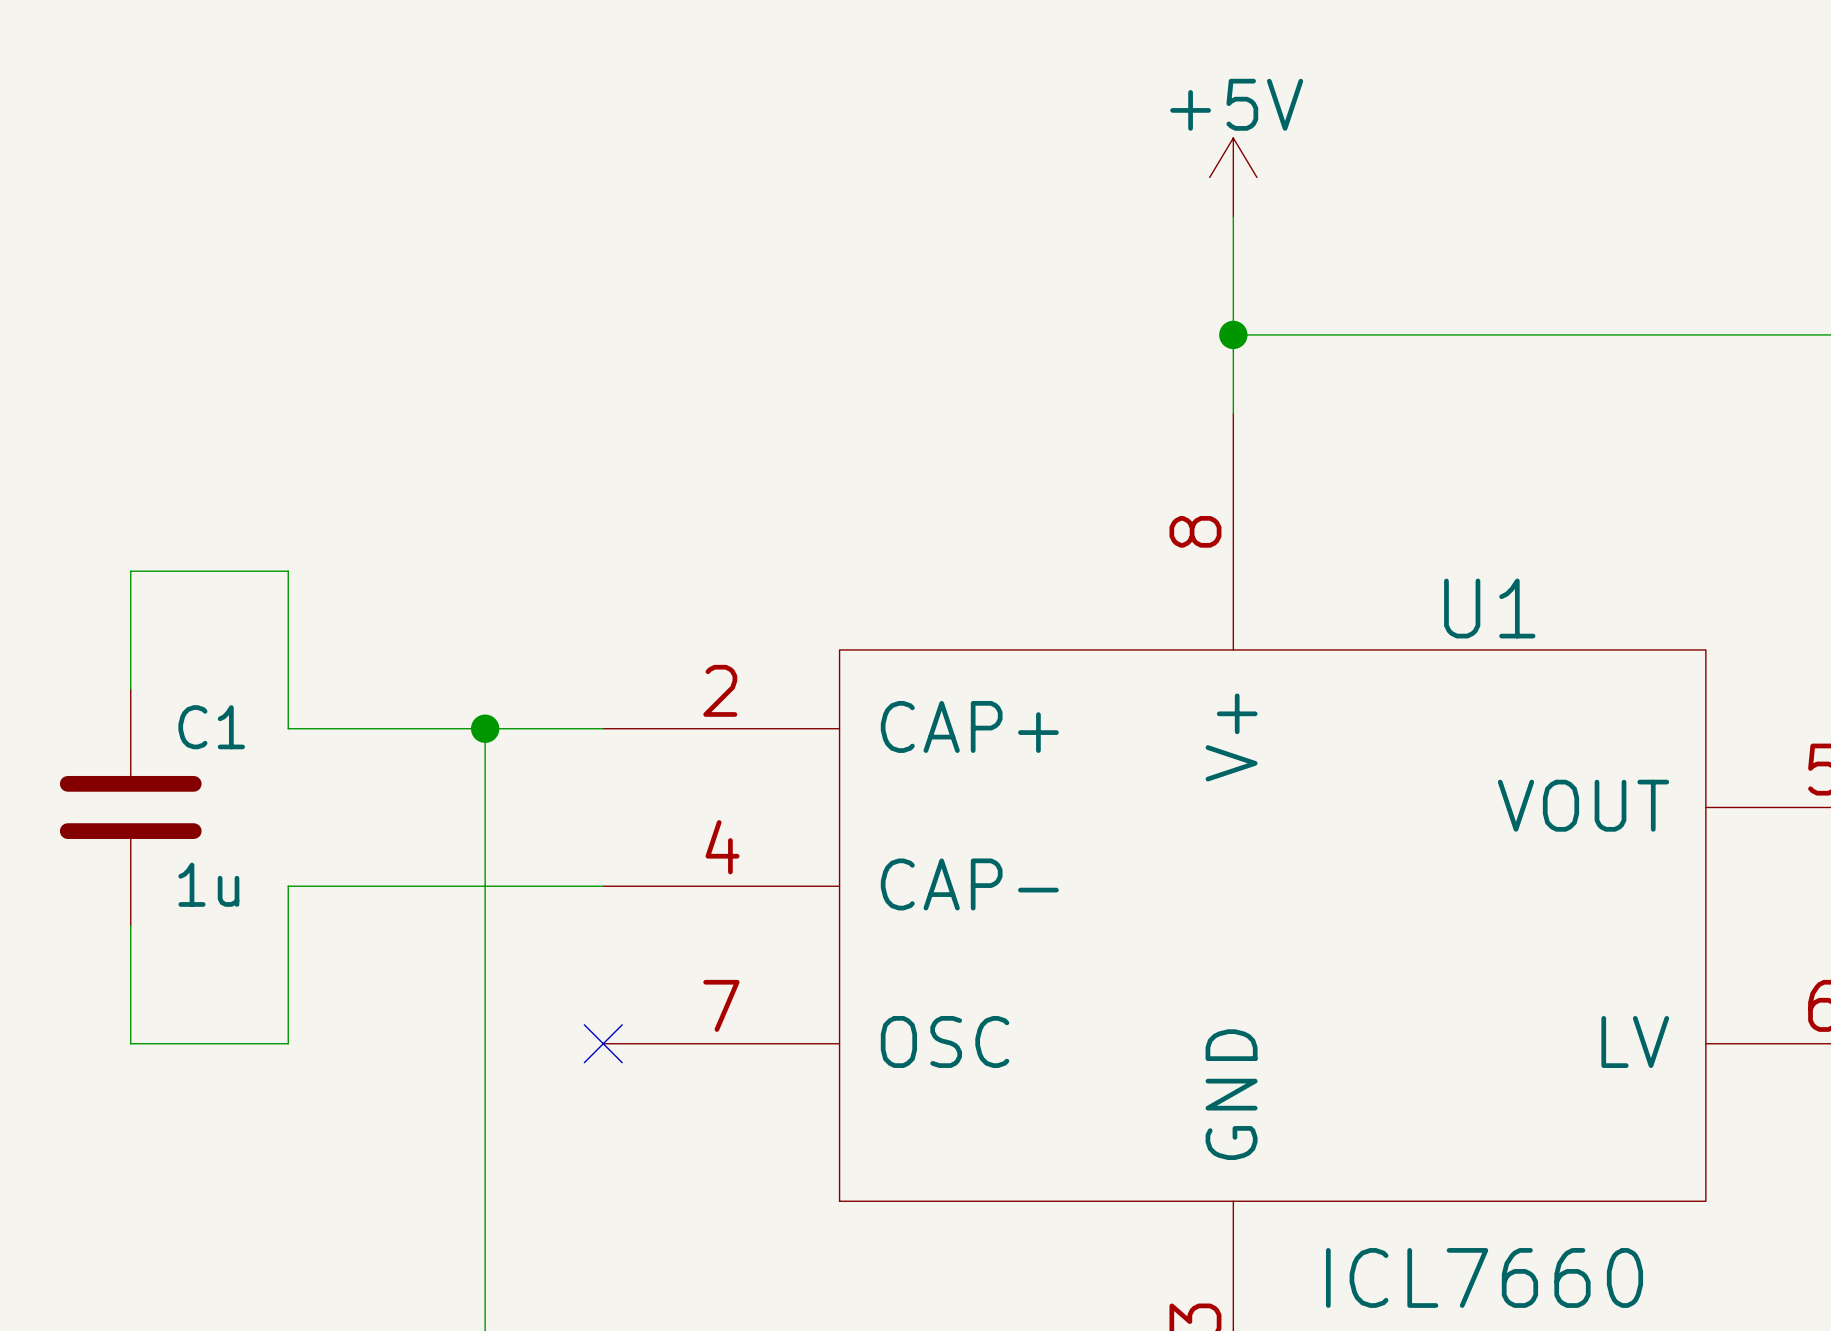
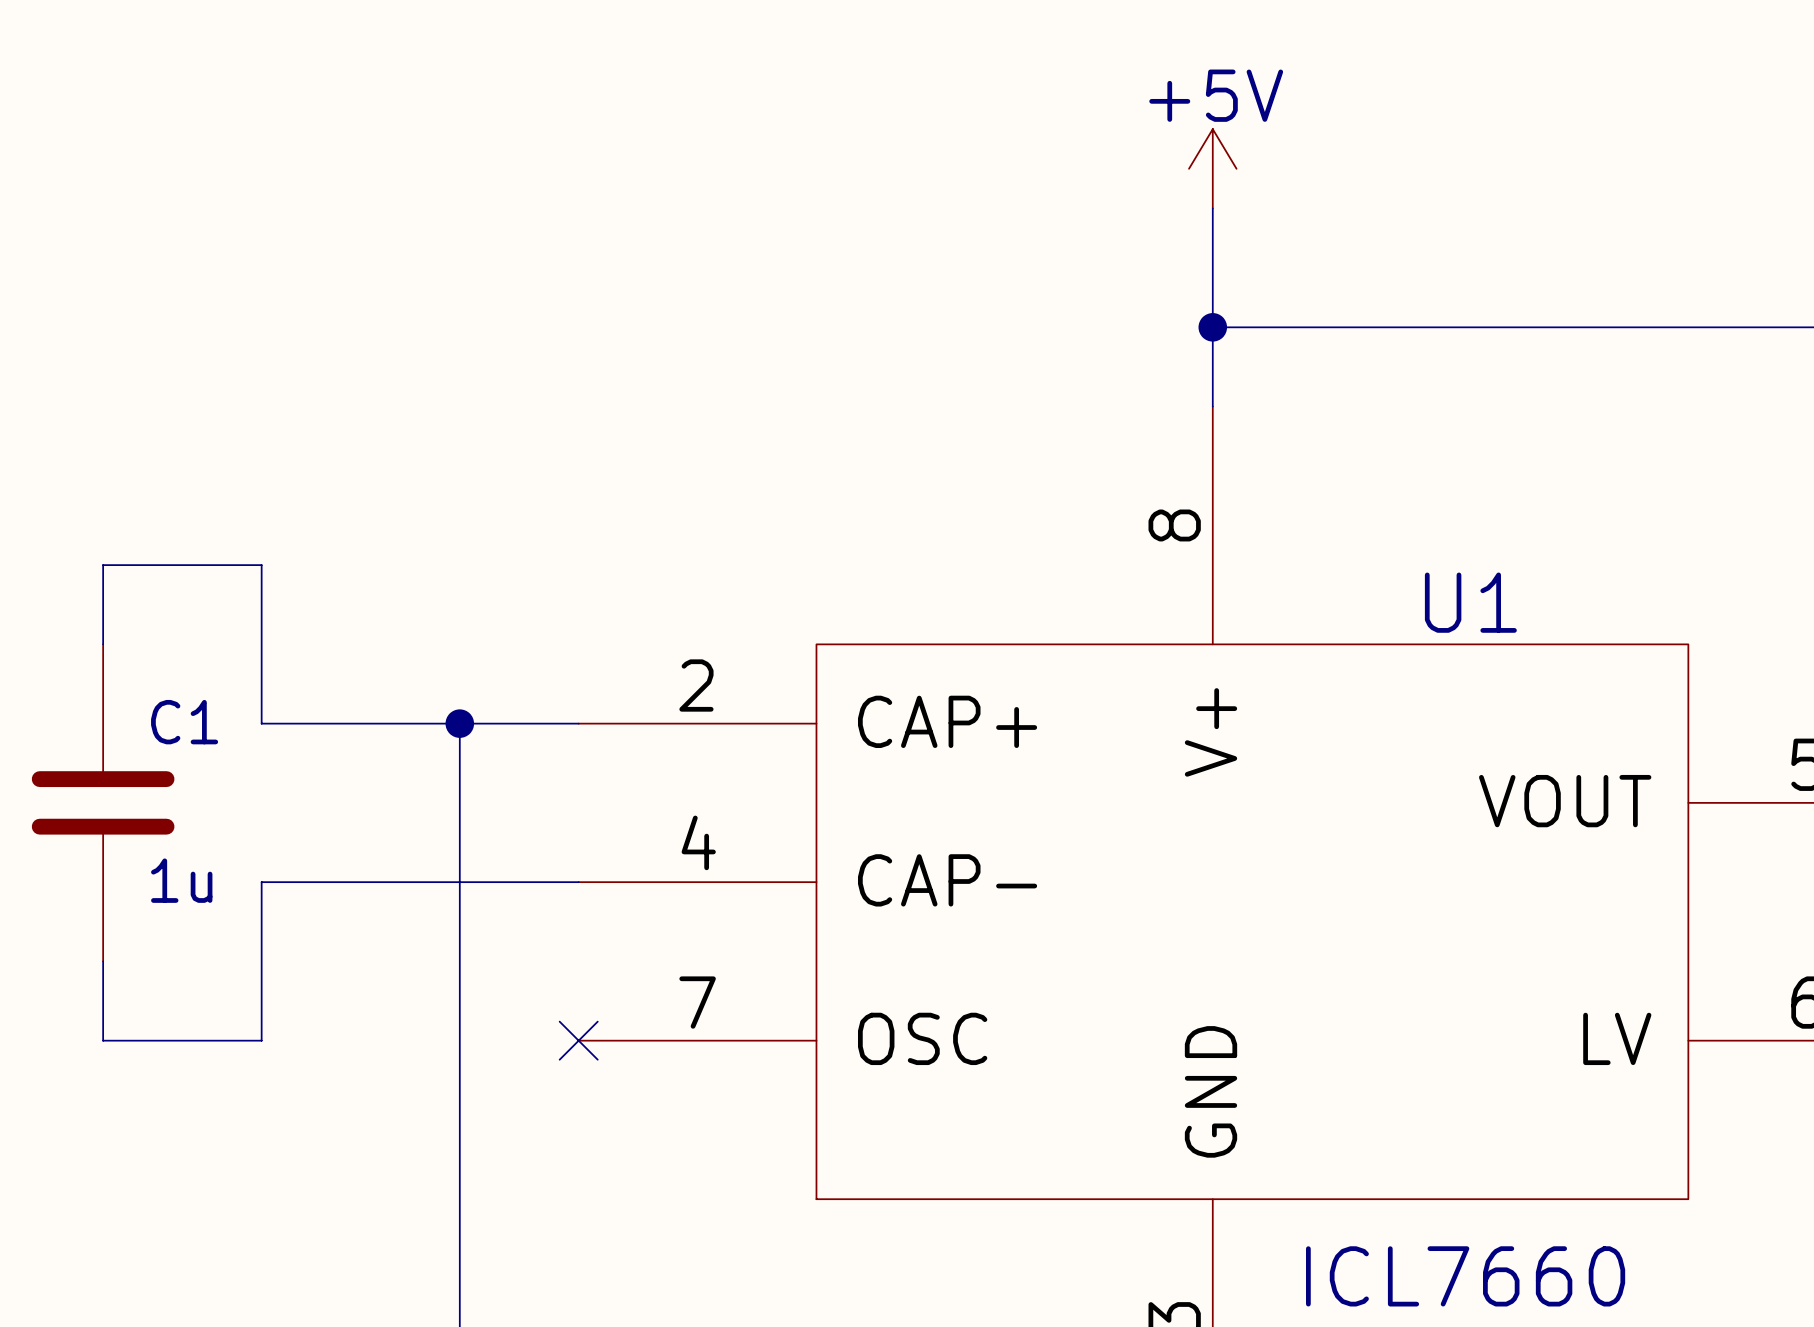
C1 symbol: [59, 689, 202, 926] -> [31, 644, 175, 962]

